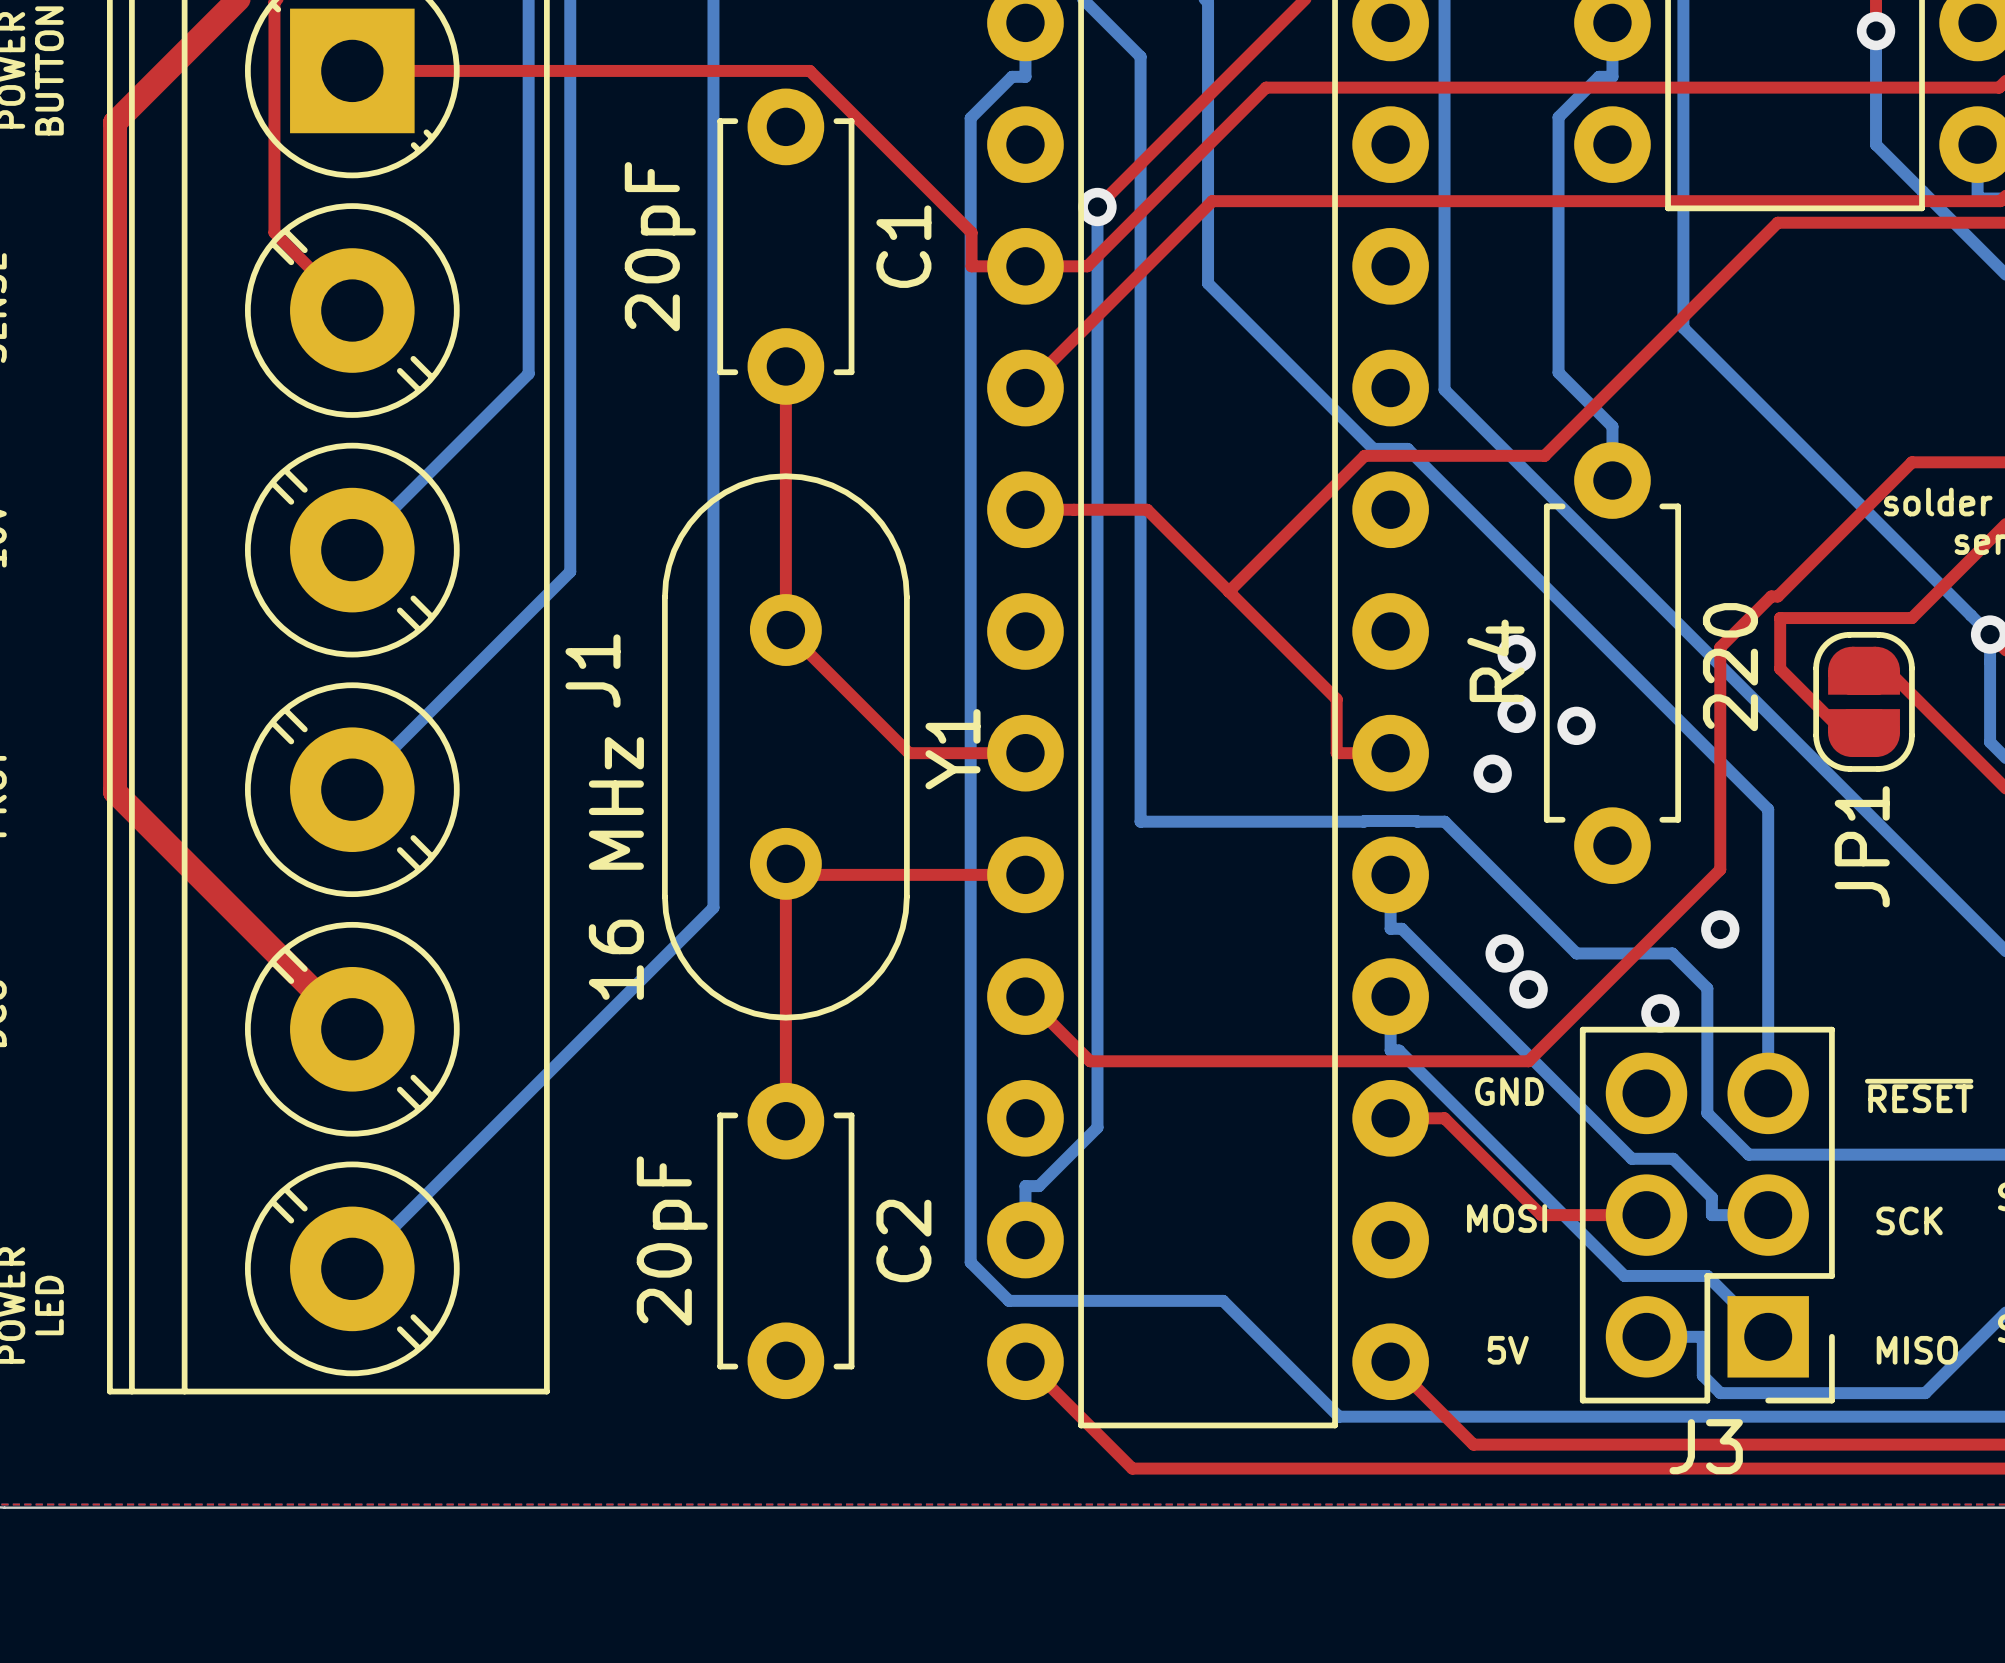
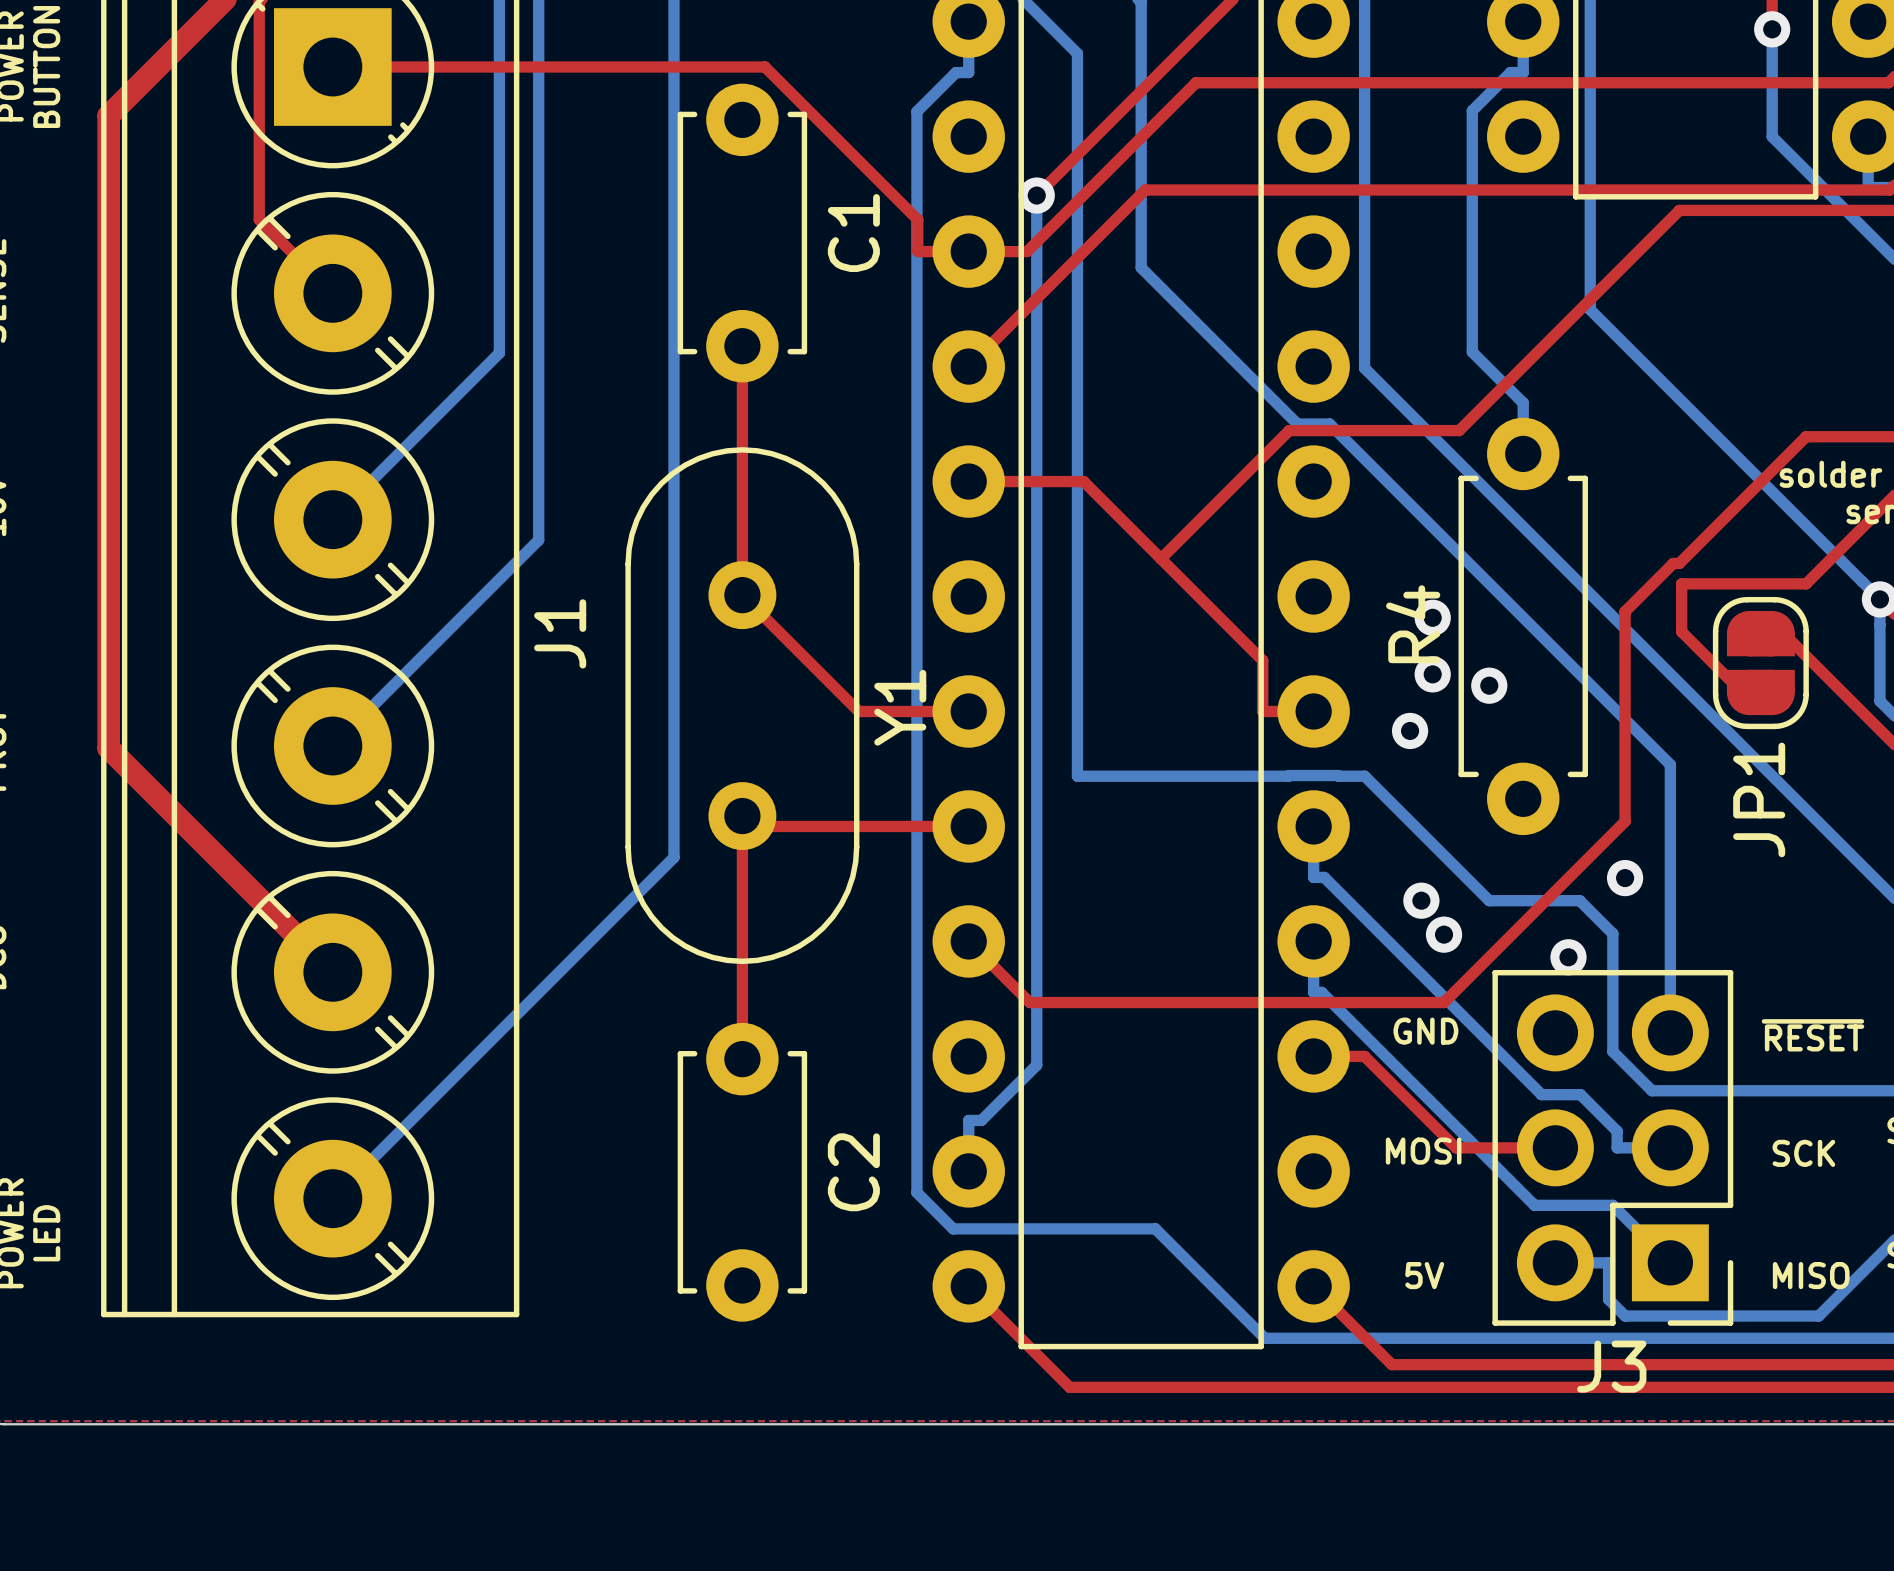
text: 20pF (660, 246) -> none
text: 220 (1730, 667) -> none
text: 16 MHz (616, 868) -> none
text: 20pF (672, 1240) -> none

